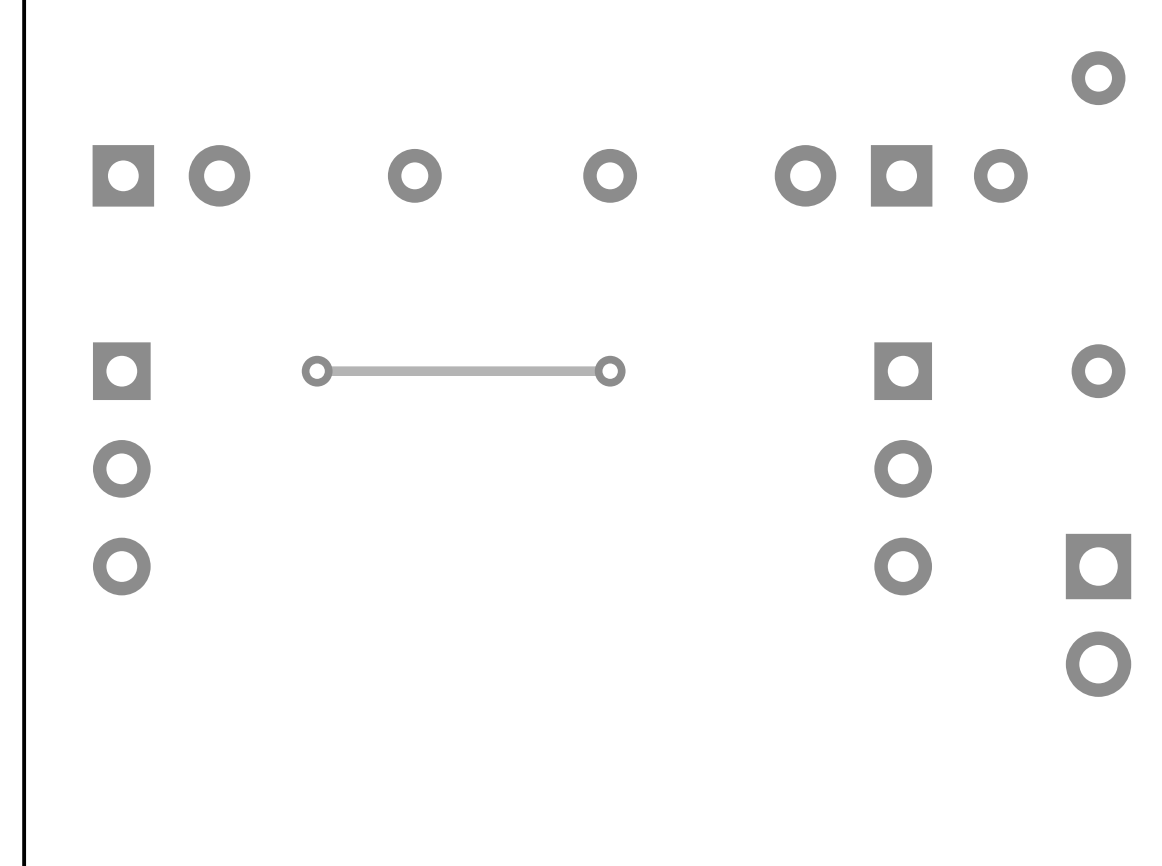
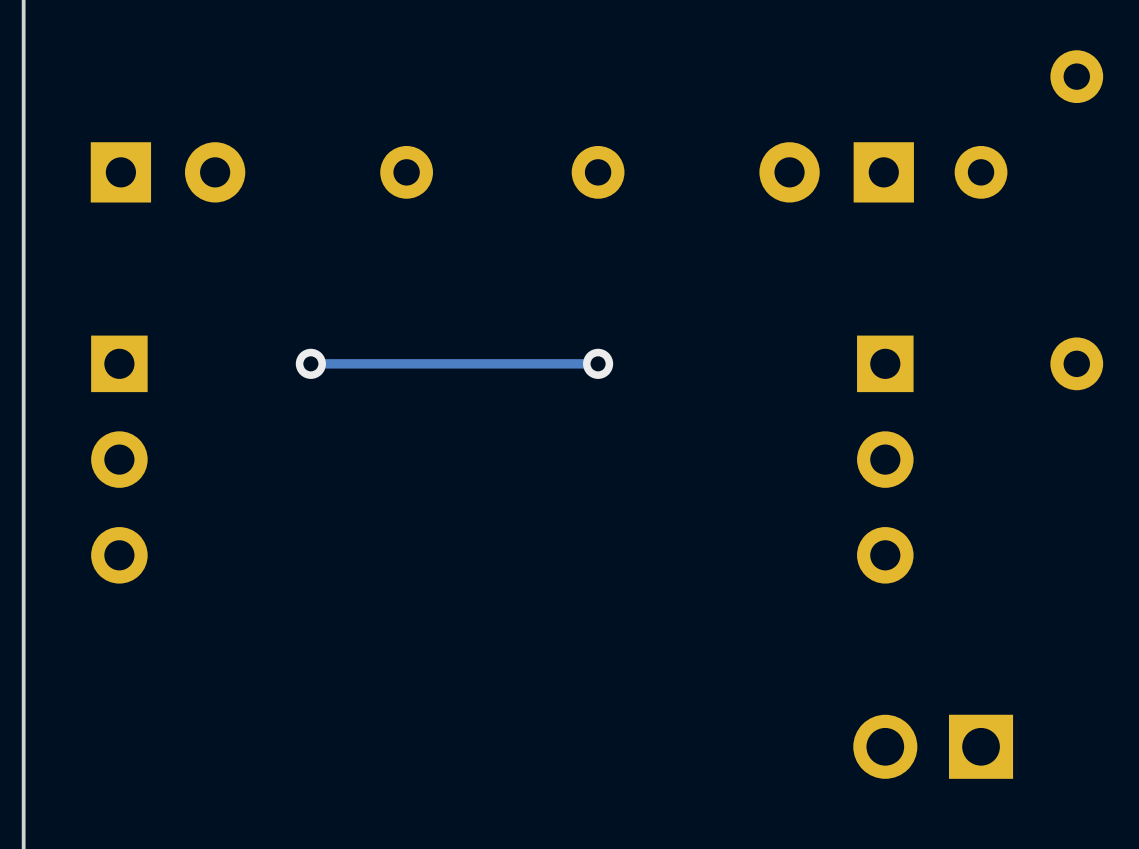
part: (1098, 615) -> none
part: none -> (933, 746)

